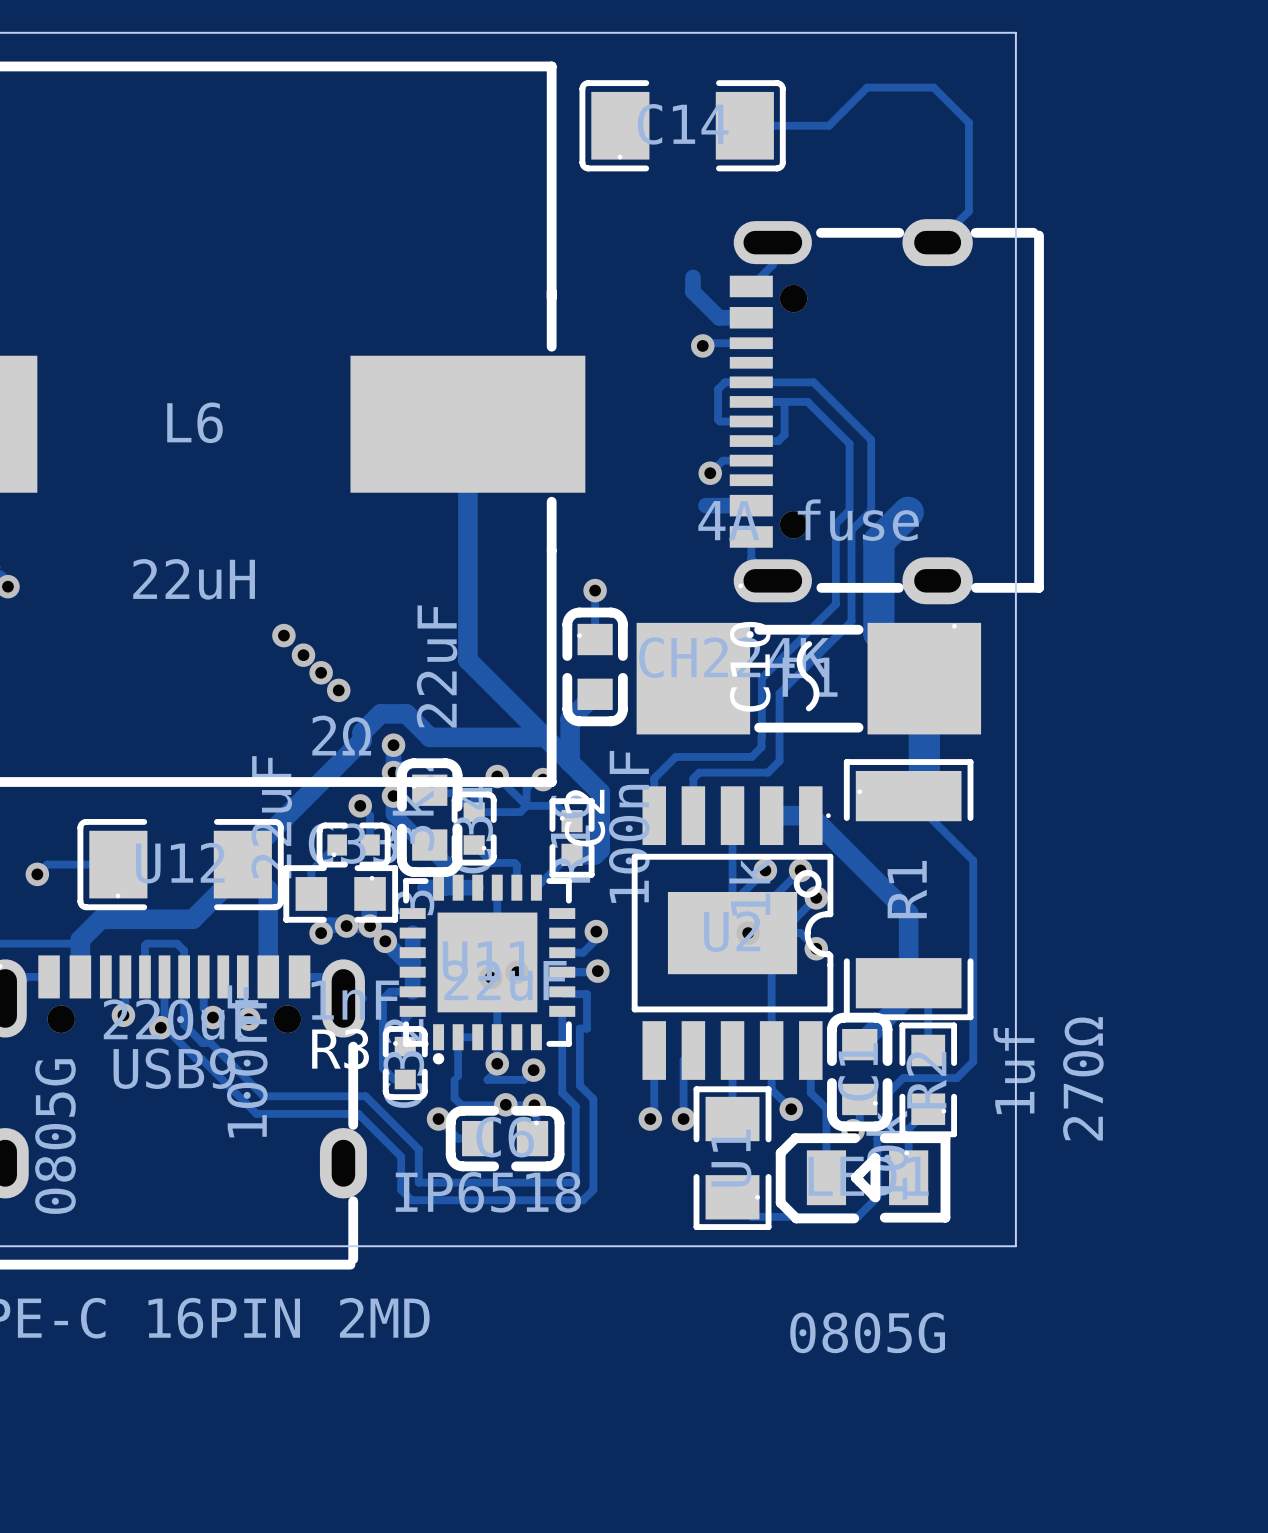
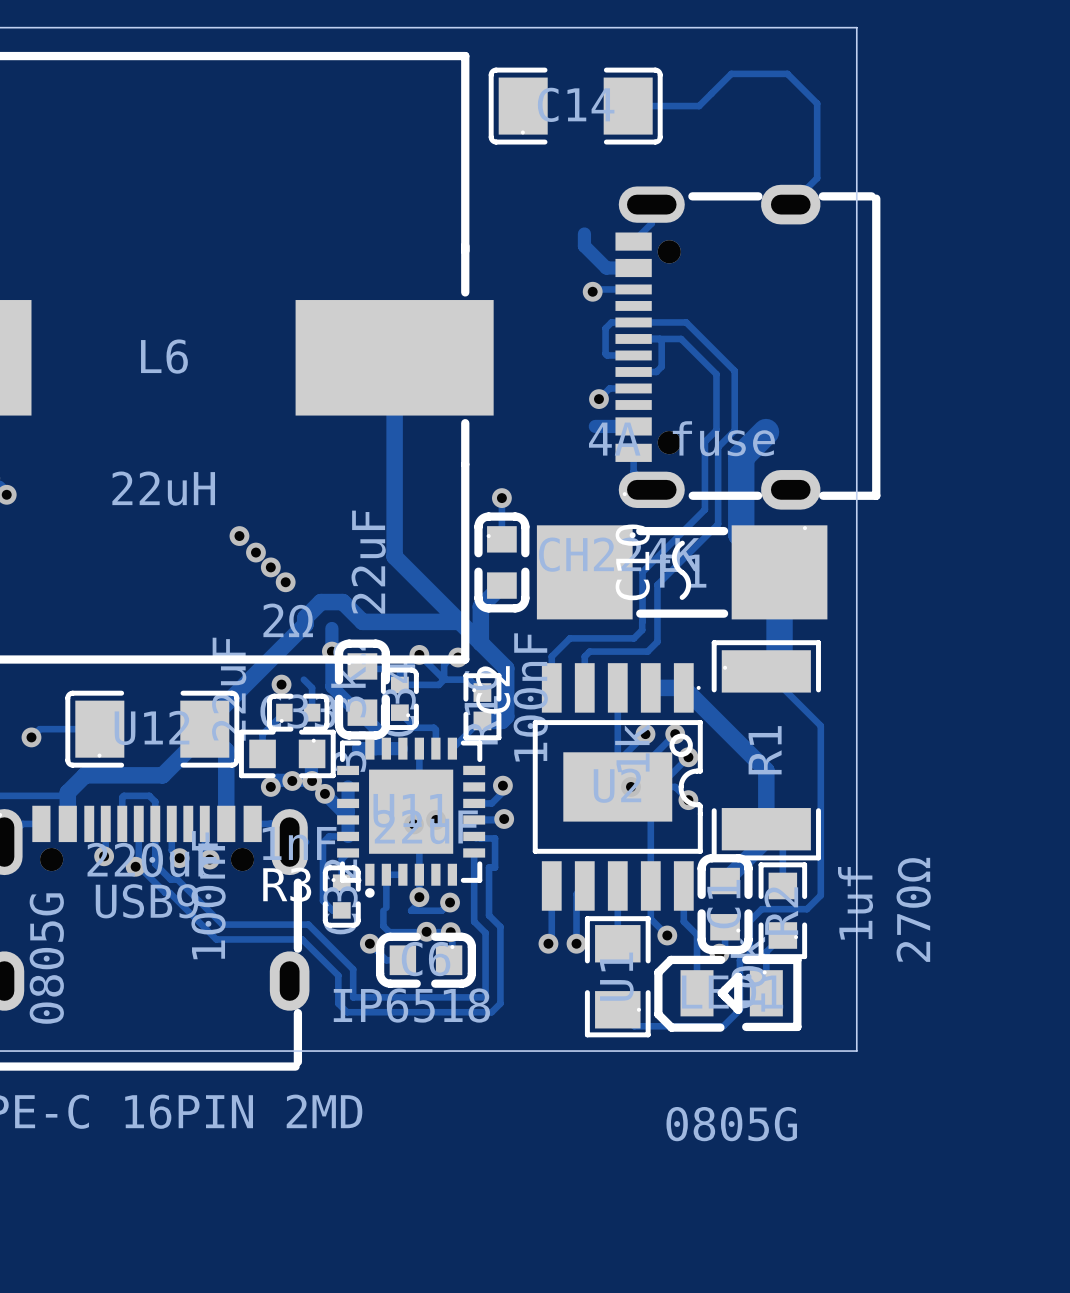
via: (393, 745) -> none
via: (393, 796) -> none
via position: (360, 805) -> (281, 684)

